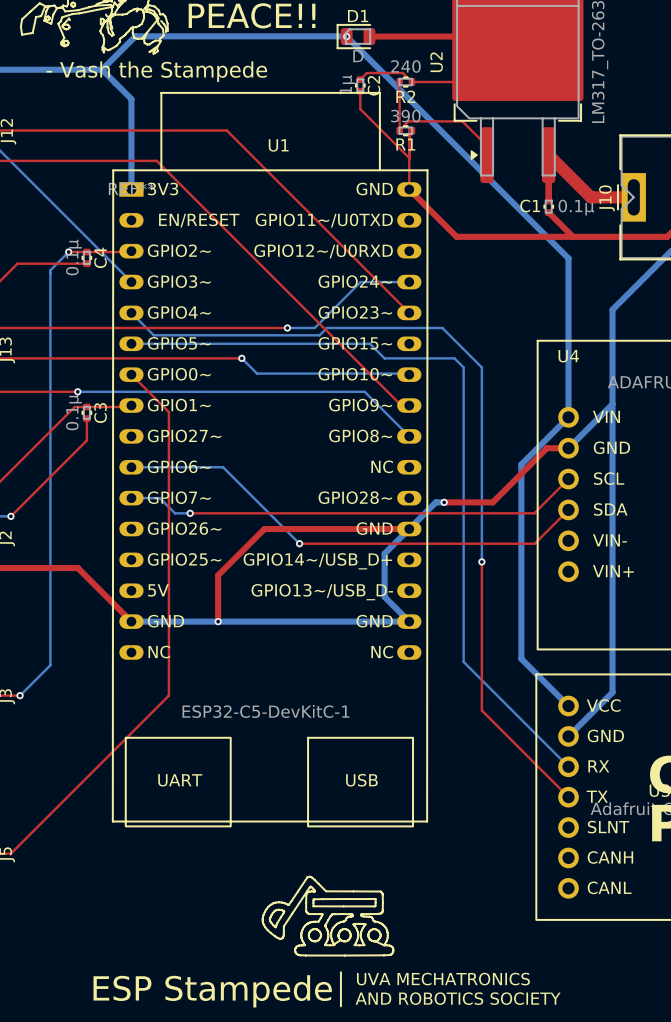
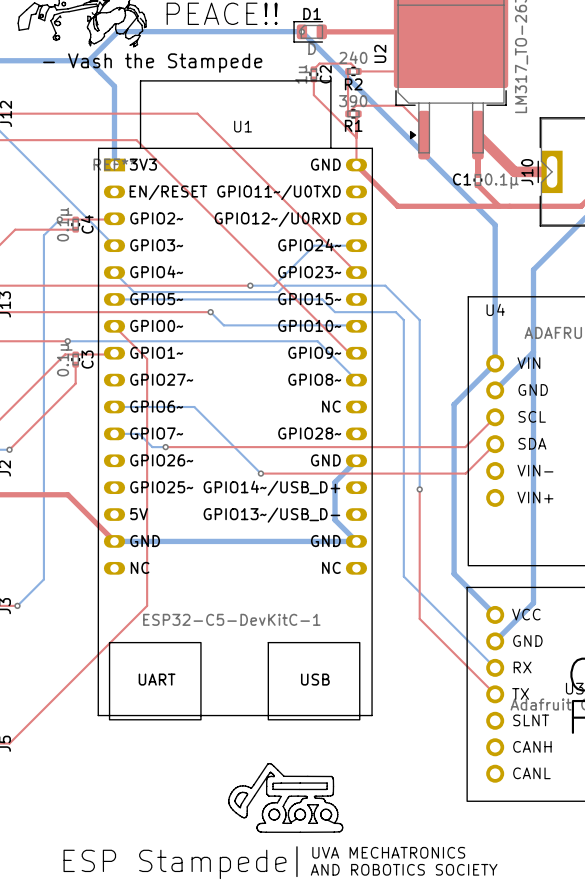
top track: (568, 448) (547, 448) (492, 502) (444, 502) -> none
bottom track: (444, 502) (435, 502) (409, 529) -> none
via: (444, 502) -> none
top track: (409, 529) (264, 529) (218, 575) (218, 621) -> none
via: (218, 621) -> none

